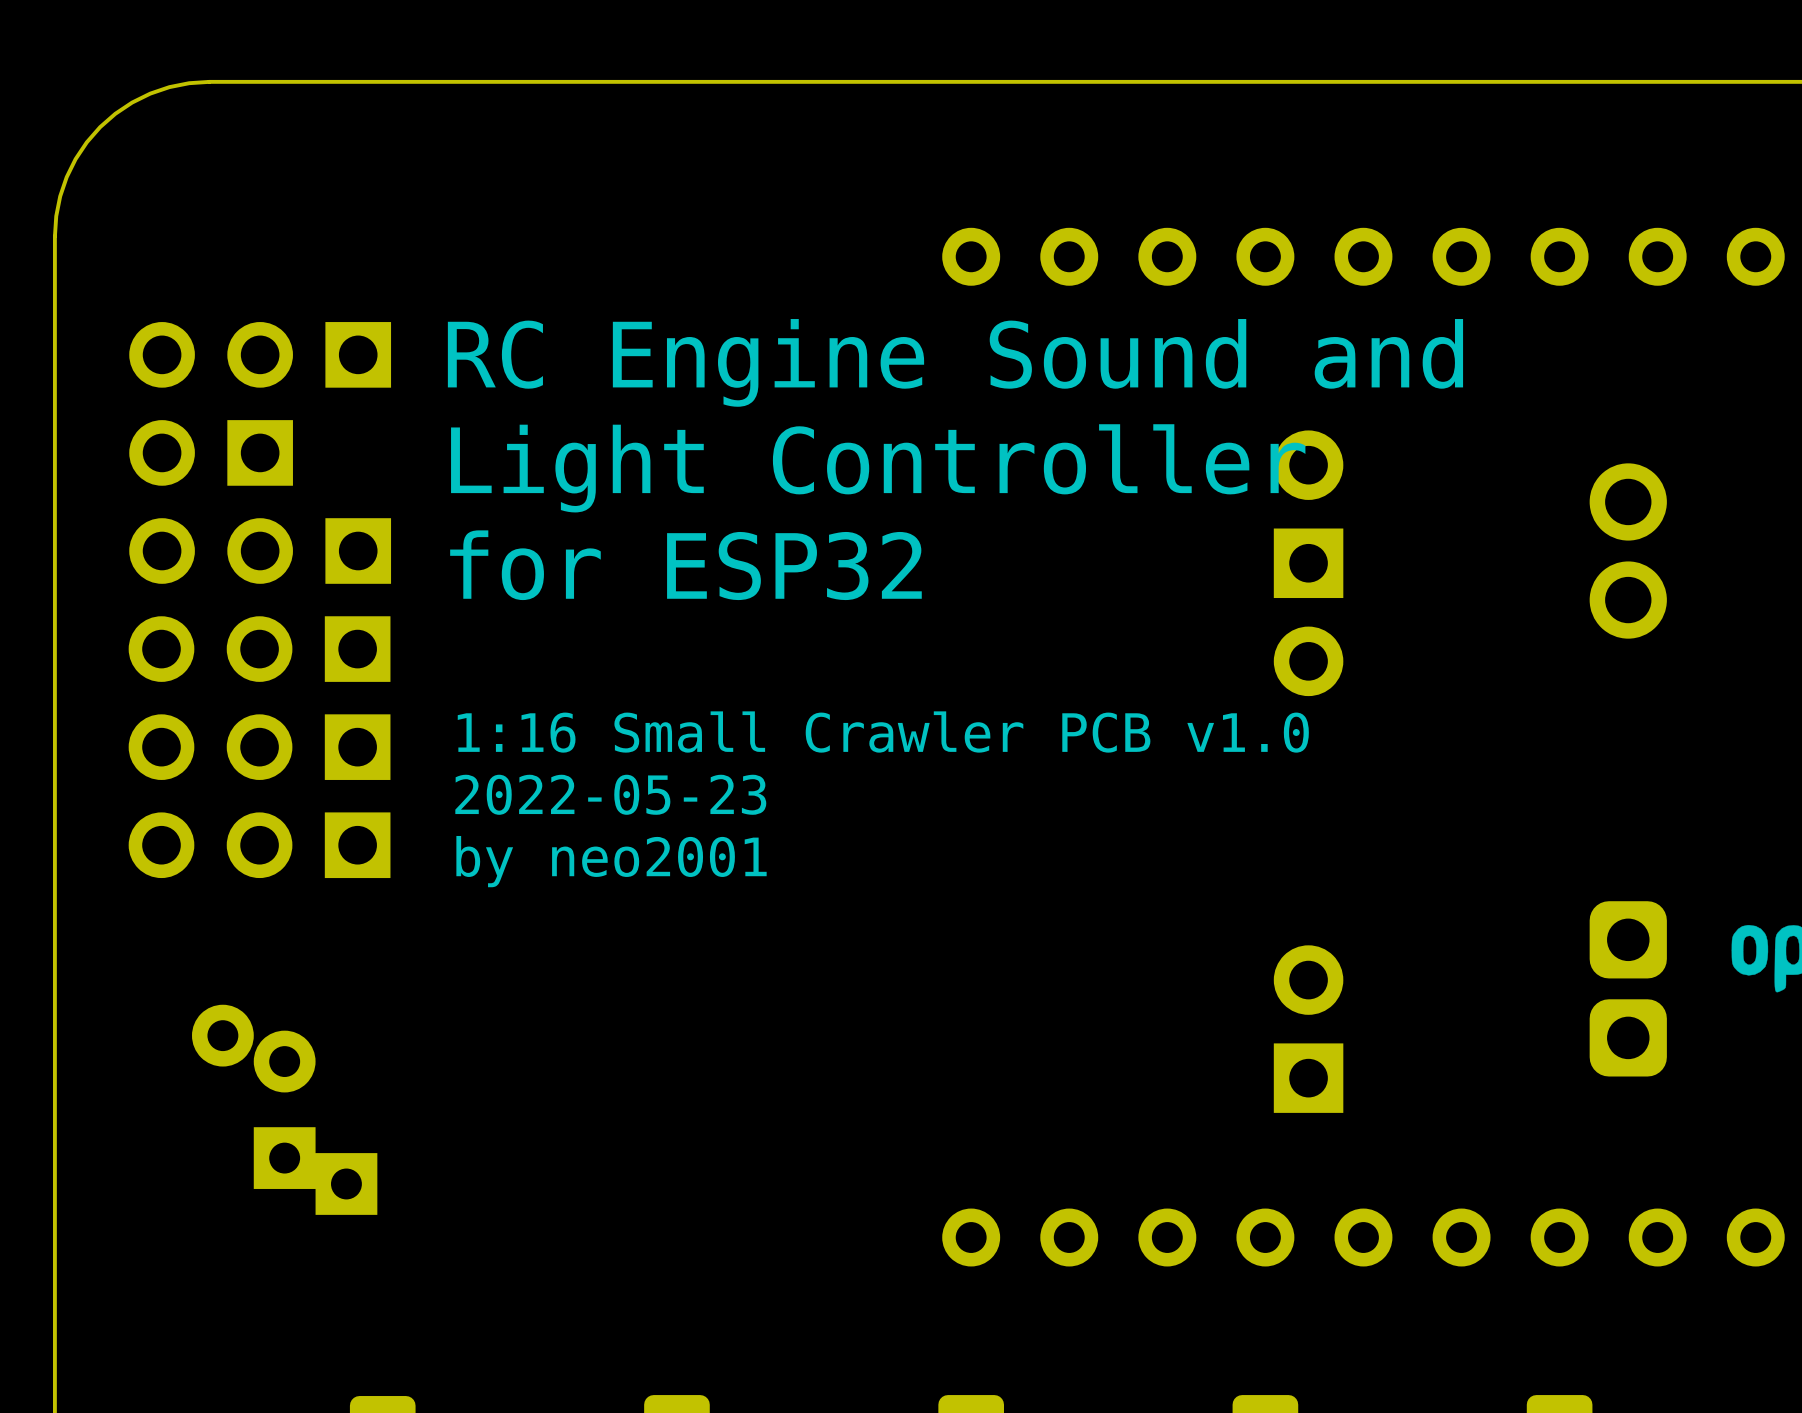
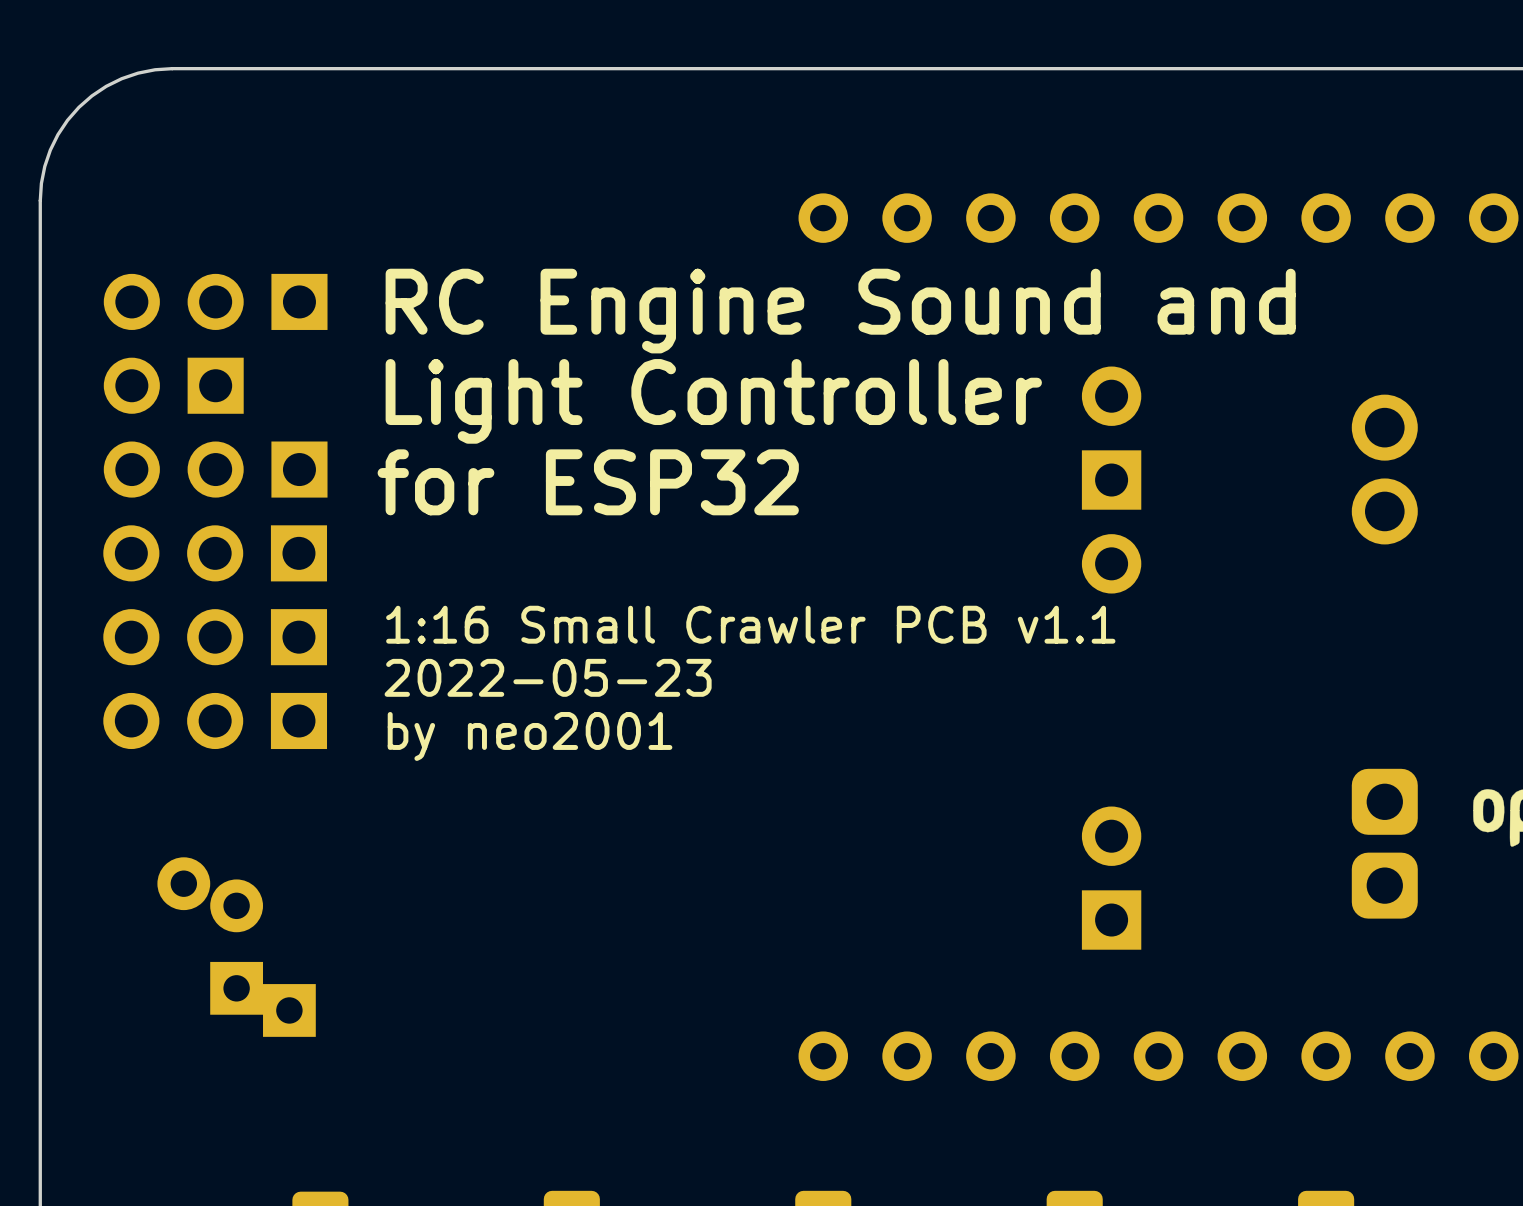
text: 1:16 Small Crawler PCB v1.0 (883, 732) -> 1:16 Small Crawler PCB v1.1 (750, 624)

